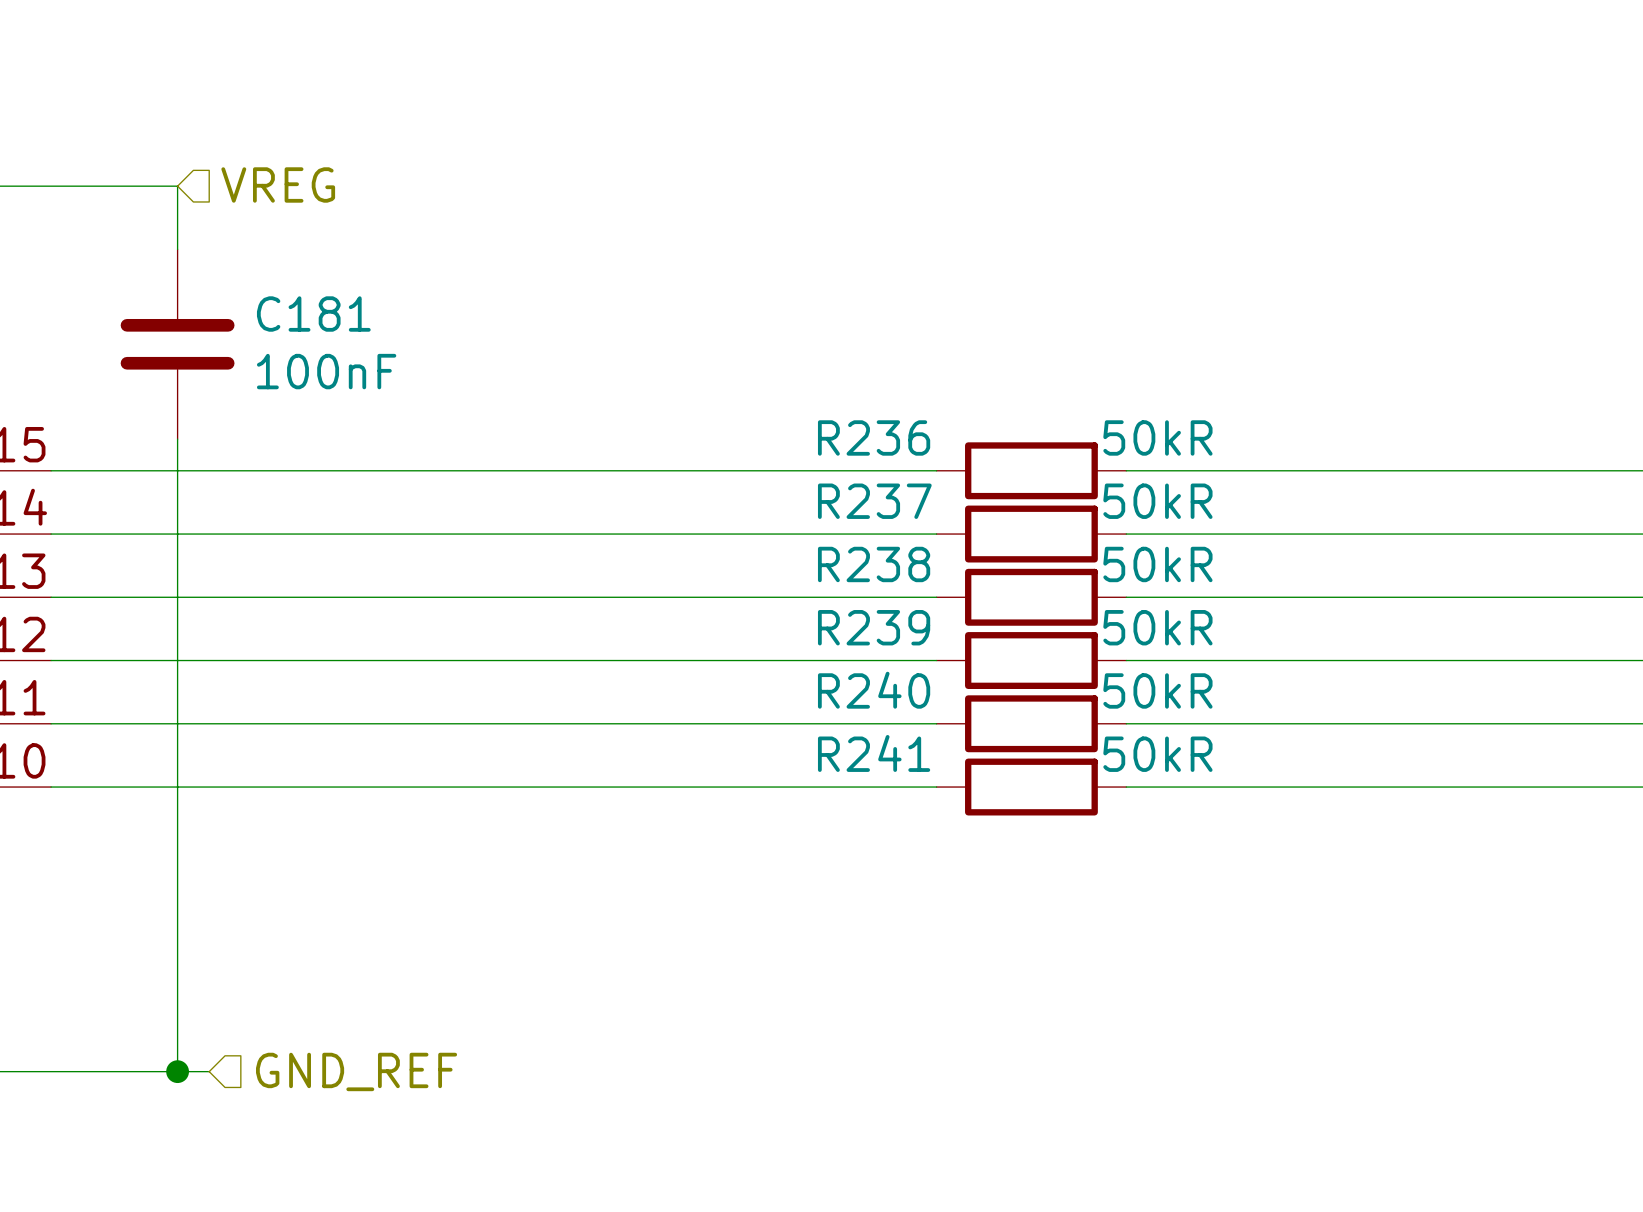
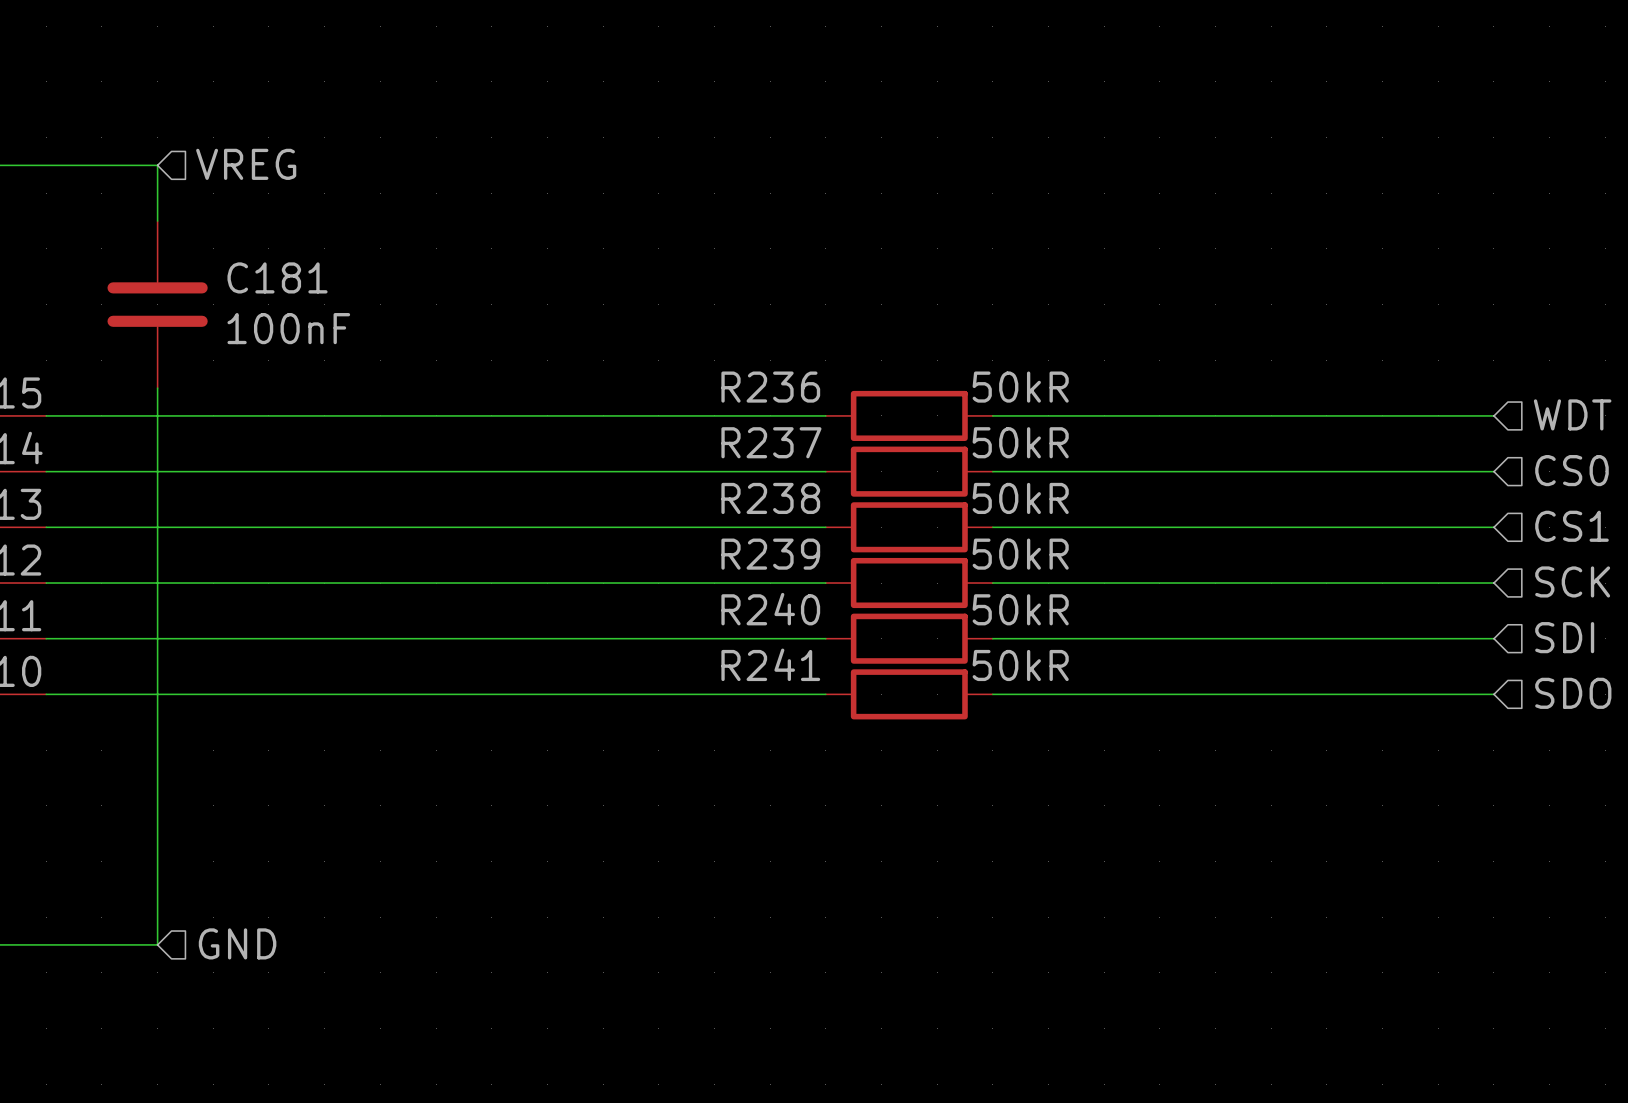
hierarchical label: none -> GND (237, 943)
wire: (177, 1071) (209, 1071) -> none
junction: (177, 1071) -> none
hierarchical label: GND_REF (356, 1071) -> none

